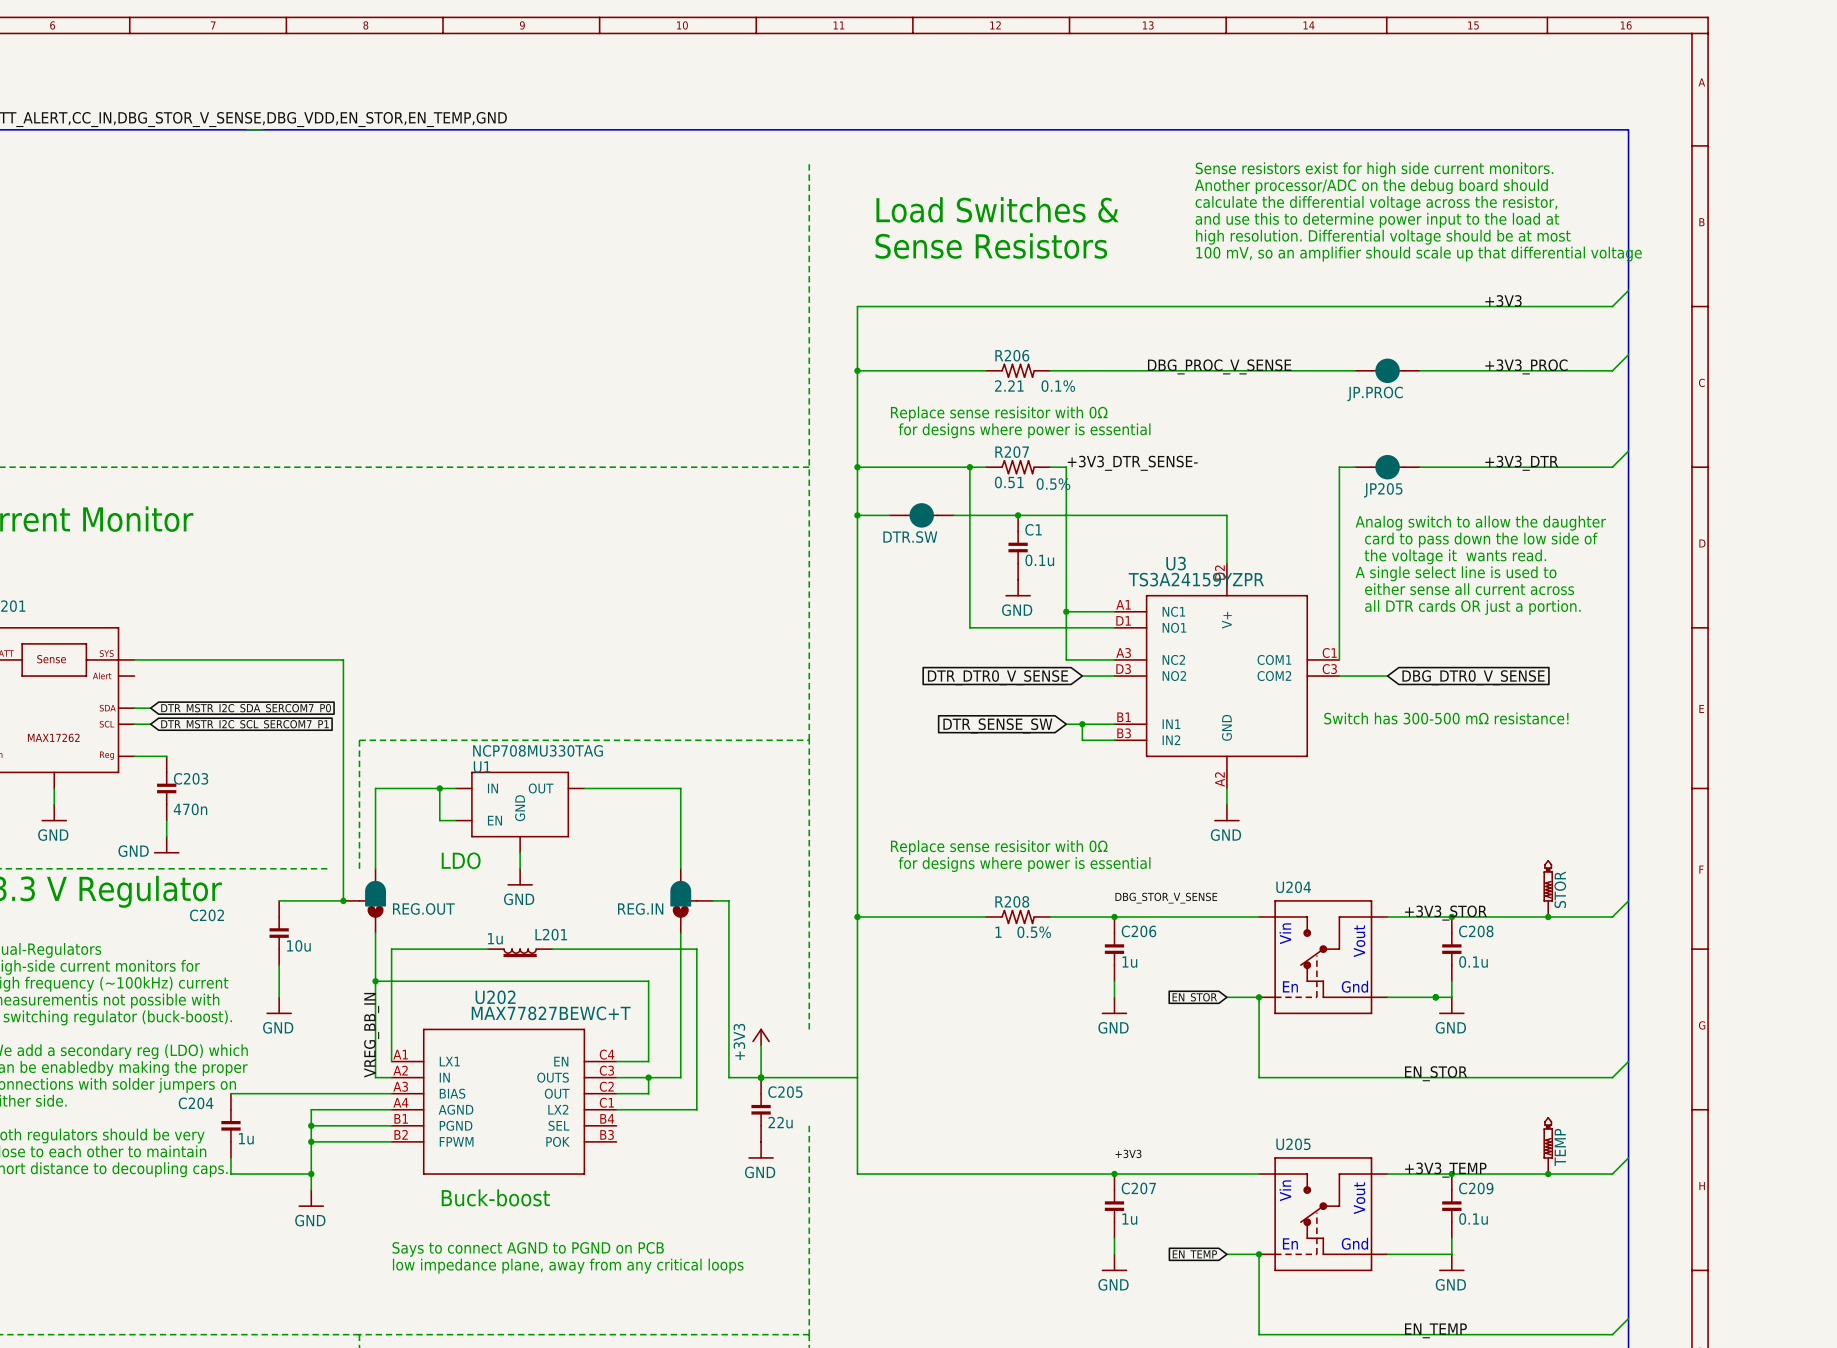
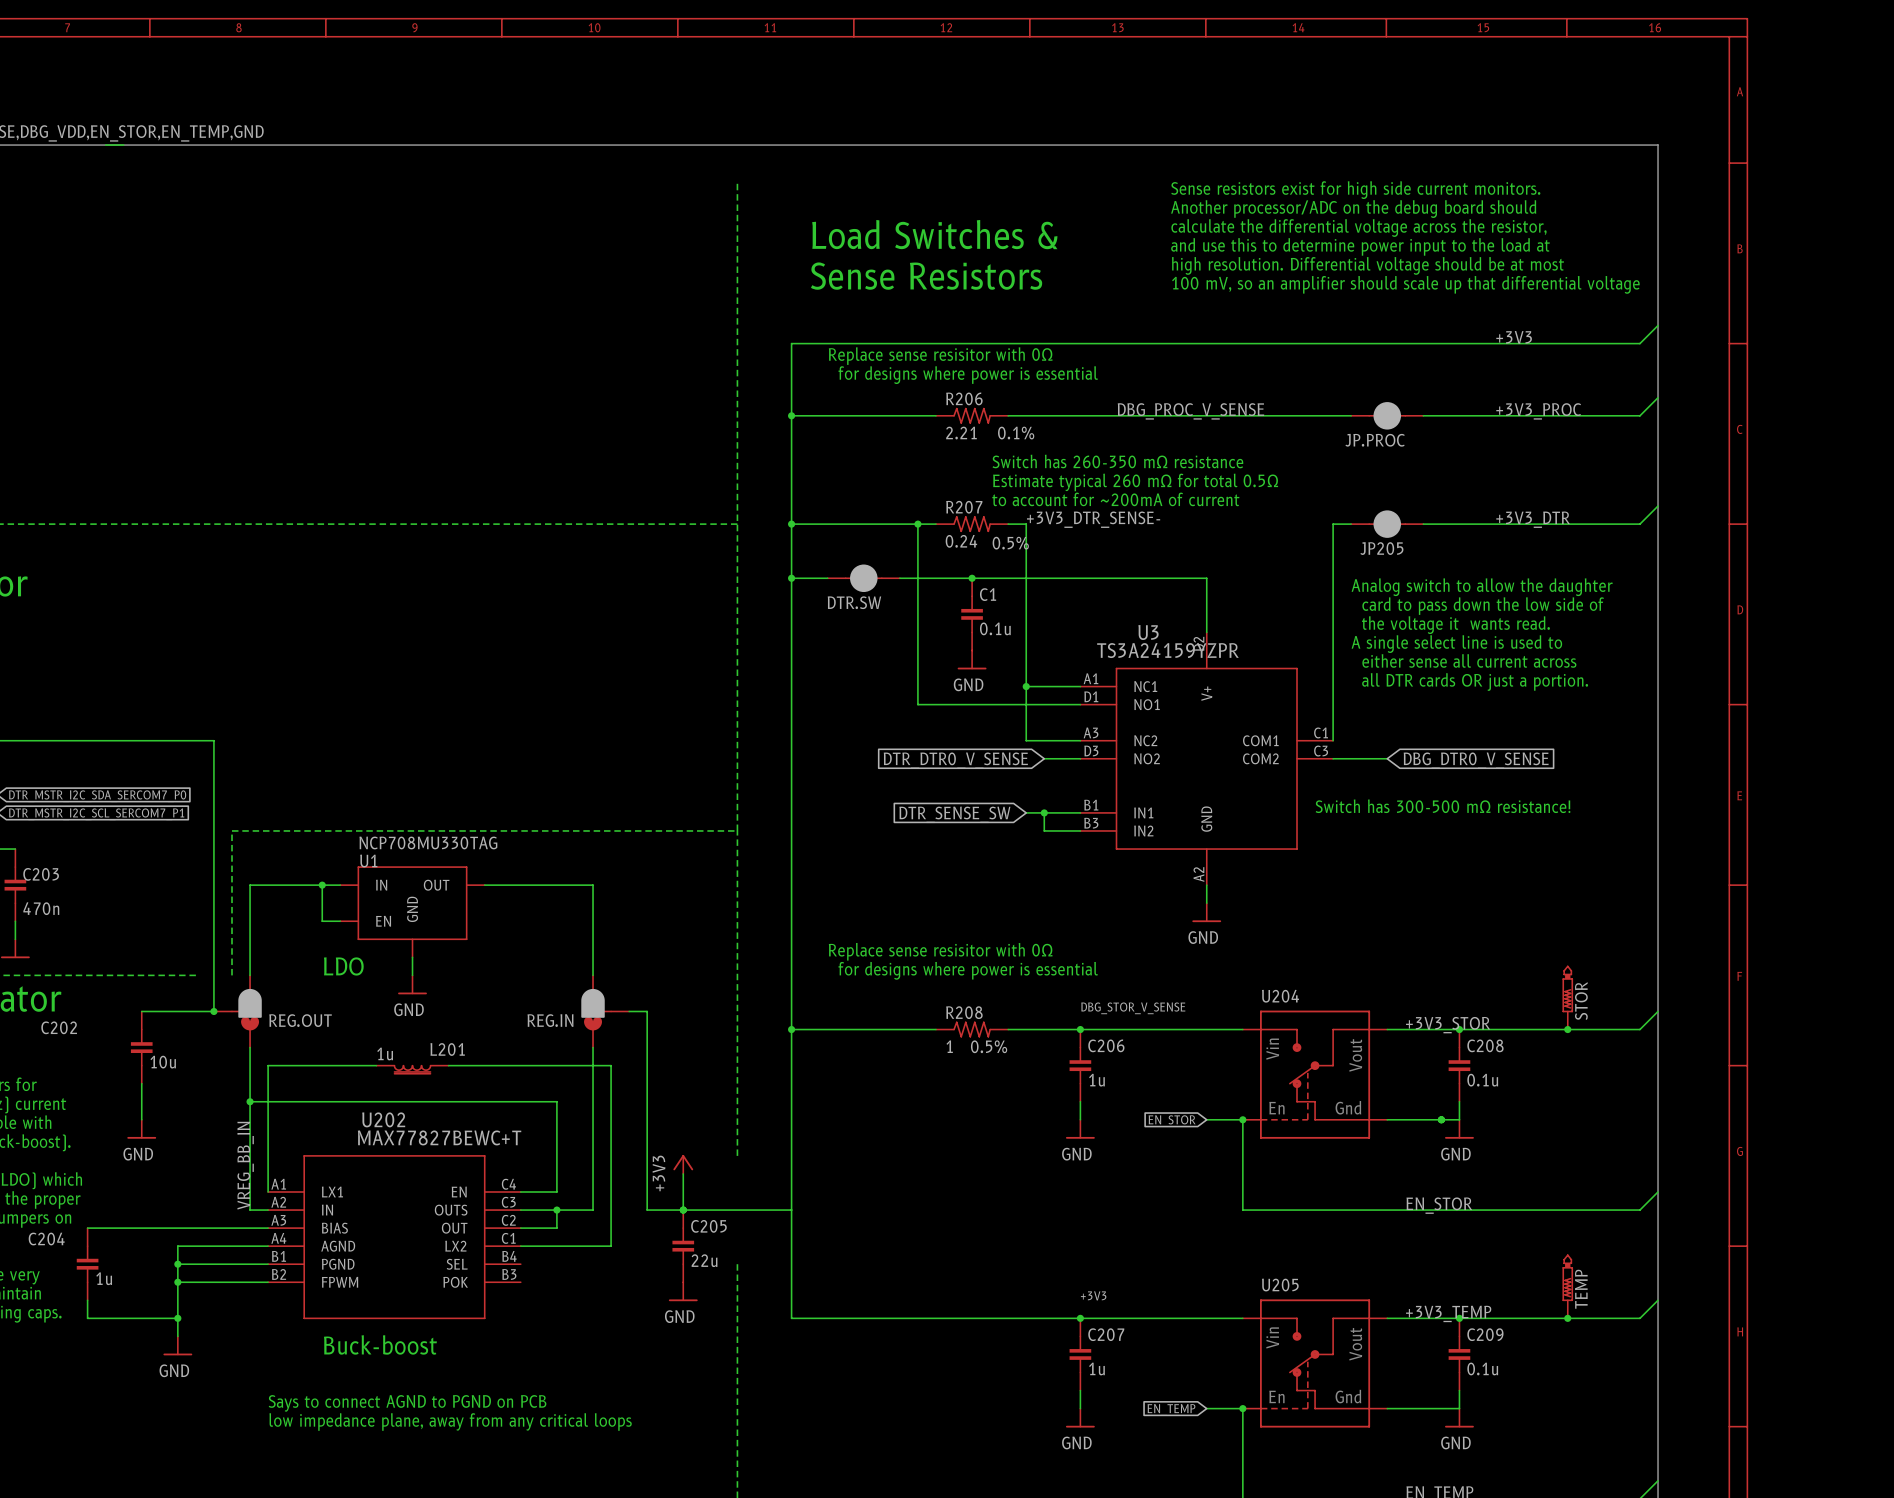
text: none -> Switch has 260-350 mΩ resistance (1117, 461)
text position: Replace sense resisitor with 0Ω (999, 413) -> Replace sense resisitor with 0Ω (940, 356)
text position: for designs where power is essential (1024, 430) -> for designs where power is essential (968, 375)
text: none -> Estimate typical 260 mΩ for total 0.5Ω (1135, 482)
text: none -> to account for ~200mA of current (1115, 499)
R207 value: 0.51 (1009, 482) -> 0.24 (961, 541)

